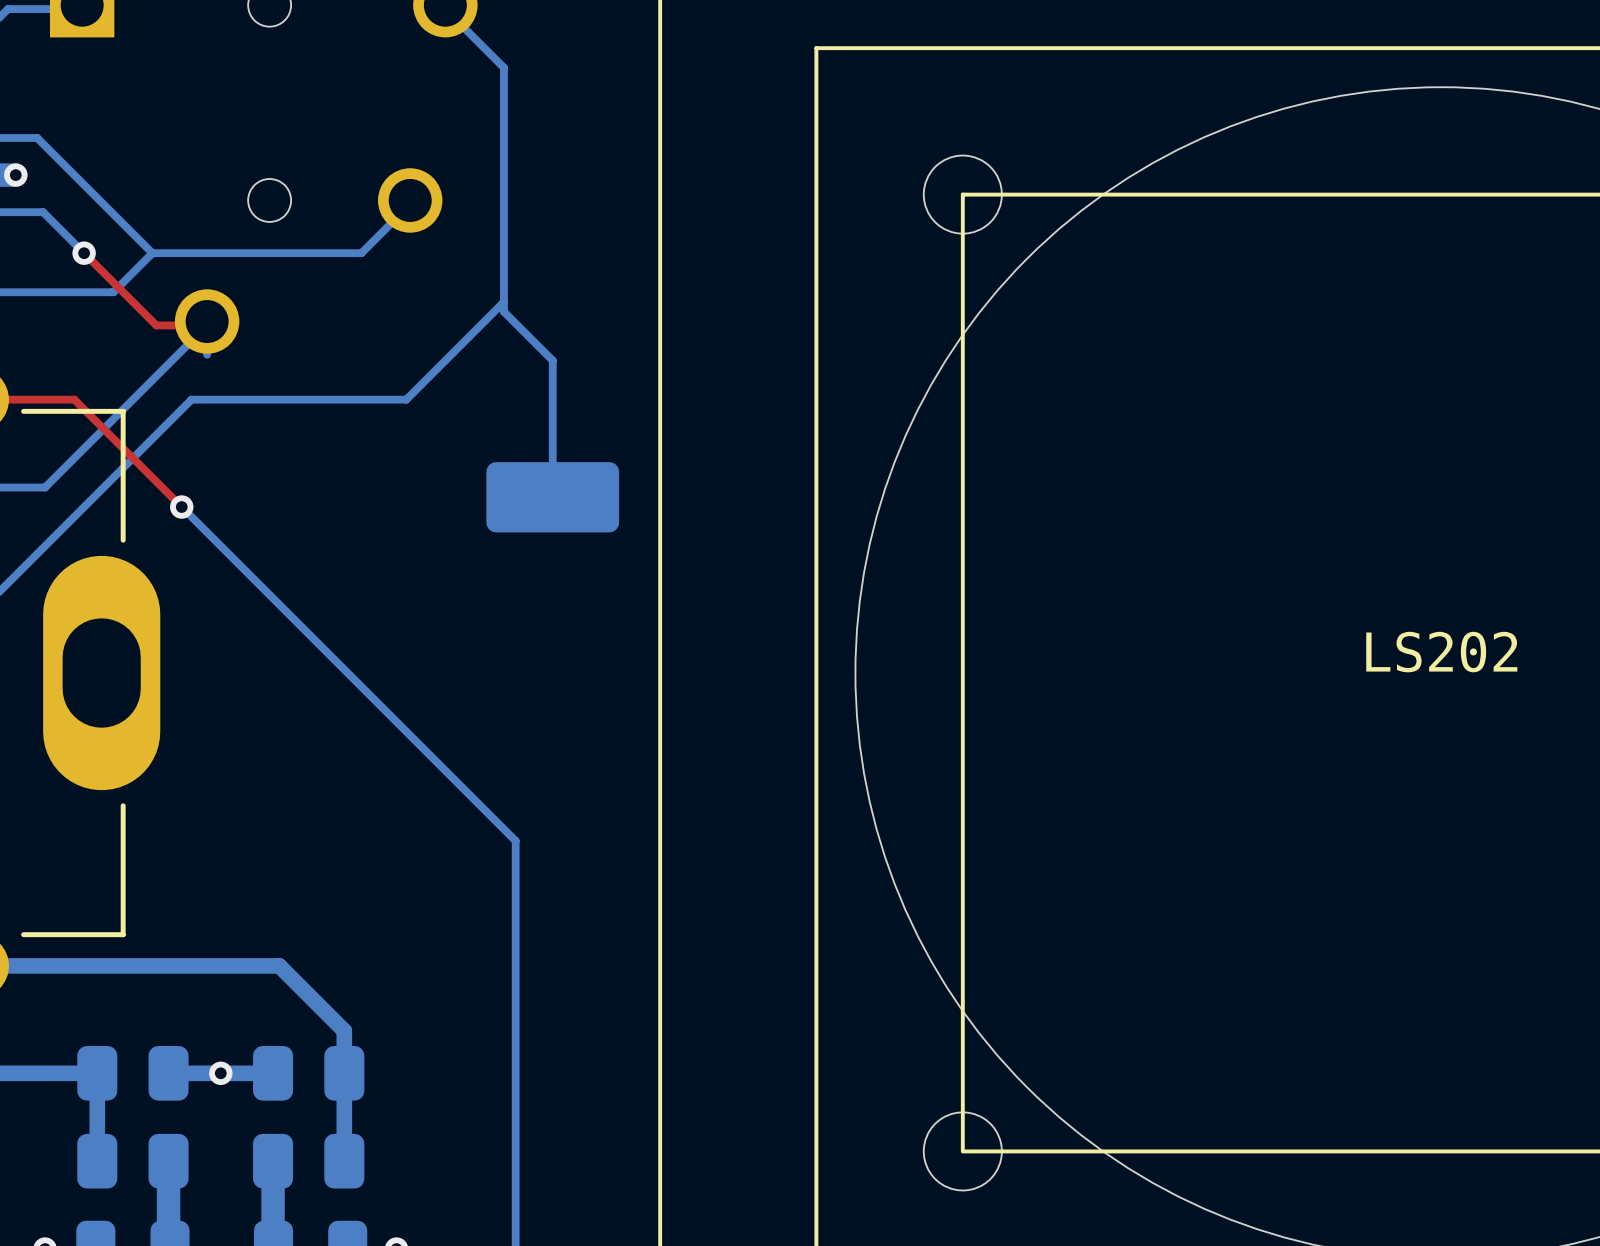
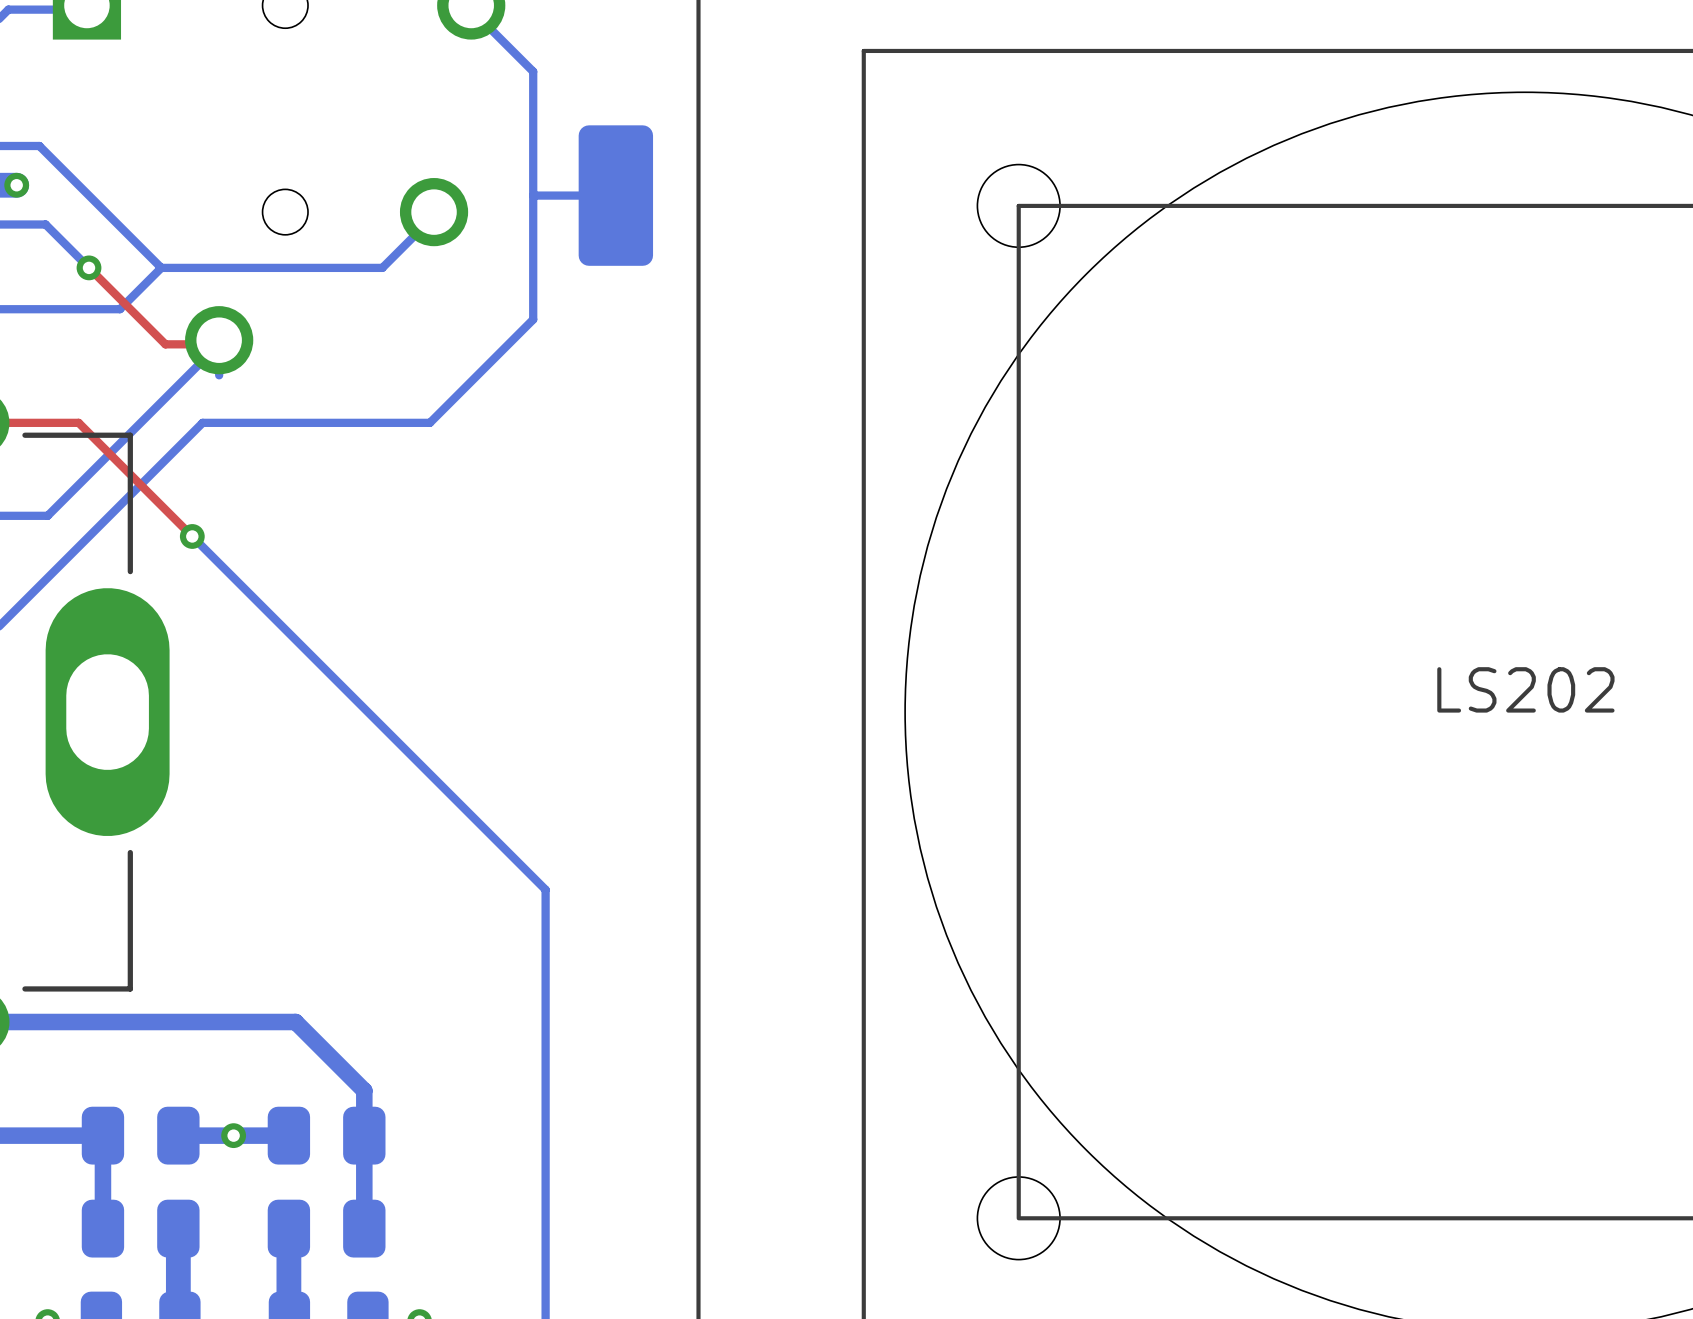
bottom track: none -> (533, 195) (615, 195)
bottom track: (503, 302) (503, 311) (552, 360) (552, 497) -> none
part rotation: 0° (552, 497) -> 90° clockwise (615, 195)
part position: (552, 497) -> (615, 195)

